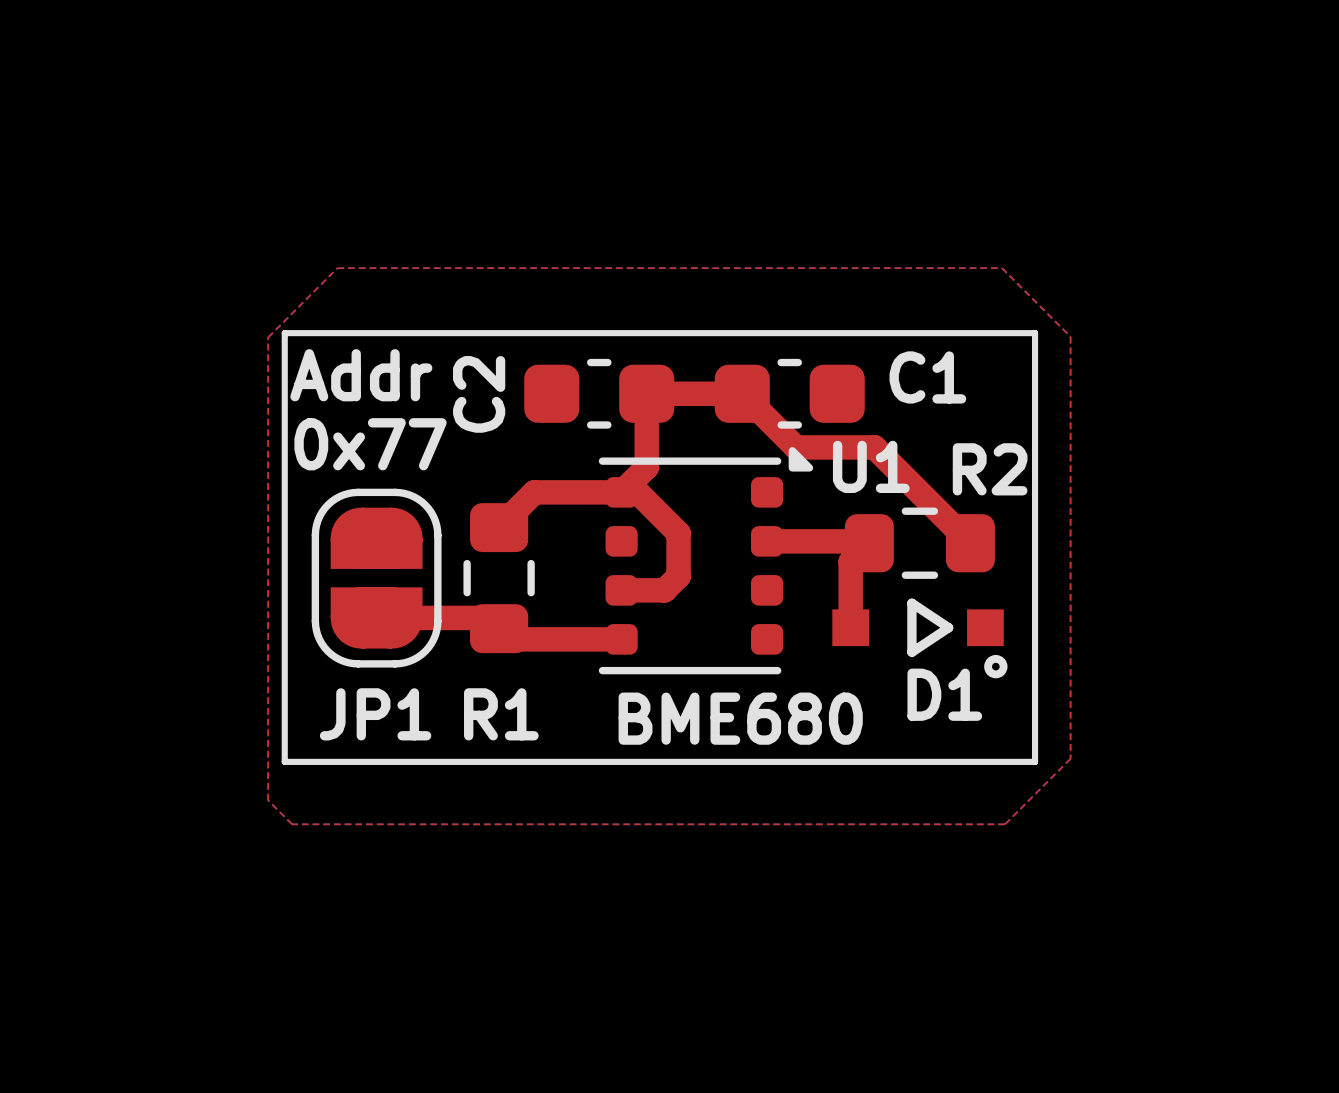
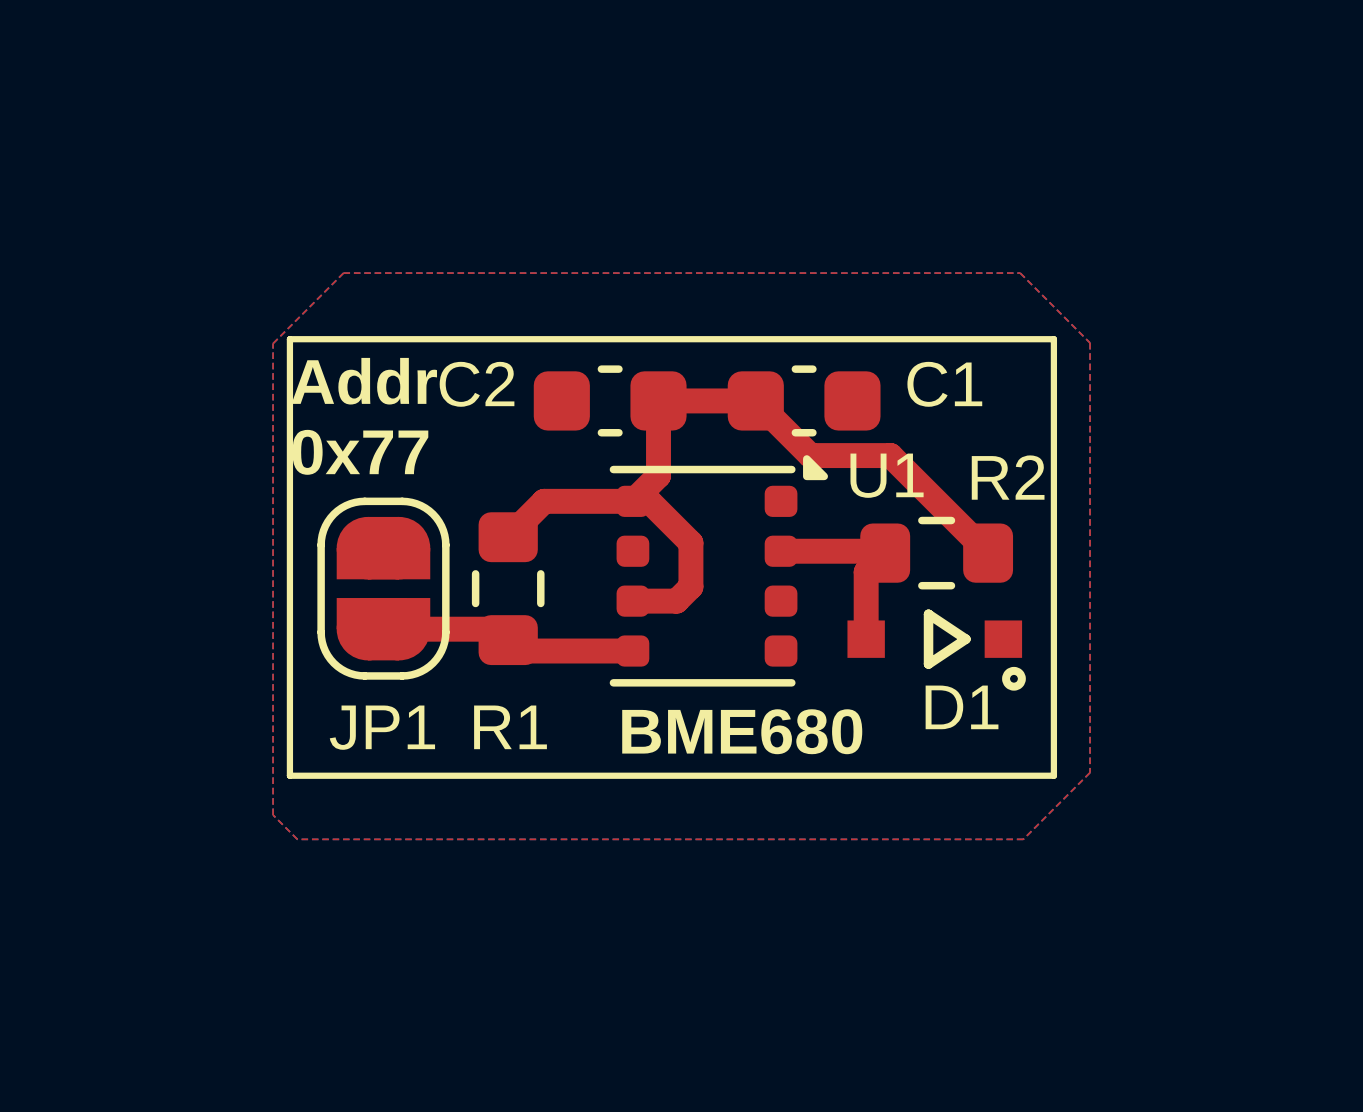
C2 name rotation: 0° (479, 394) -> 90° clockwise (477, 384)

